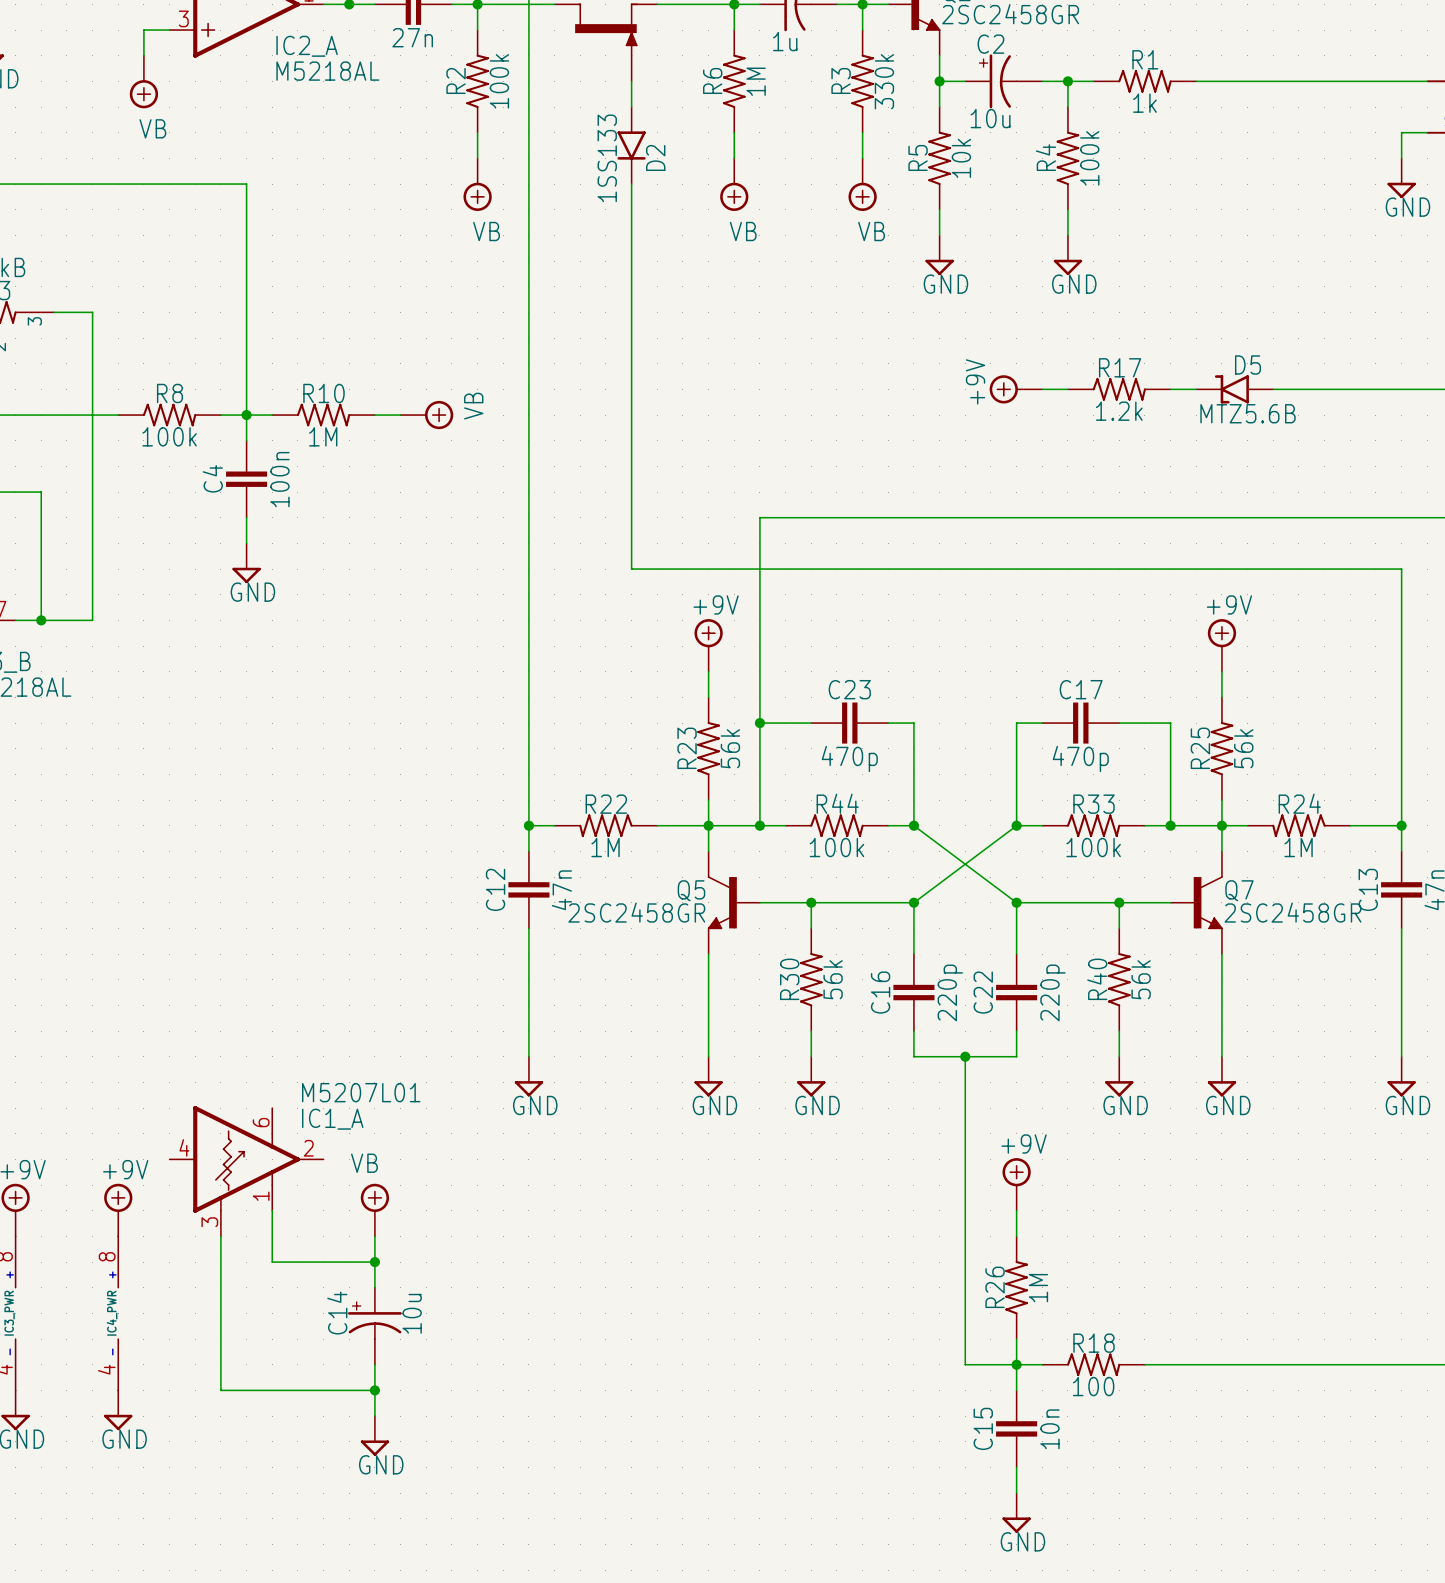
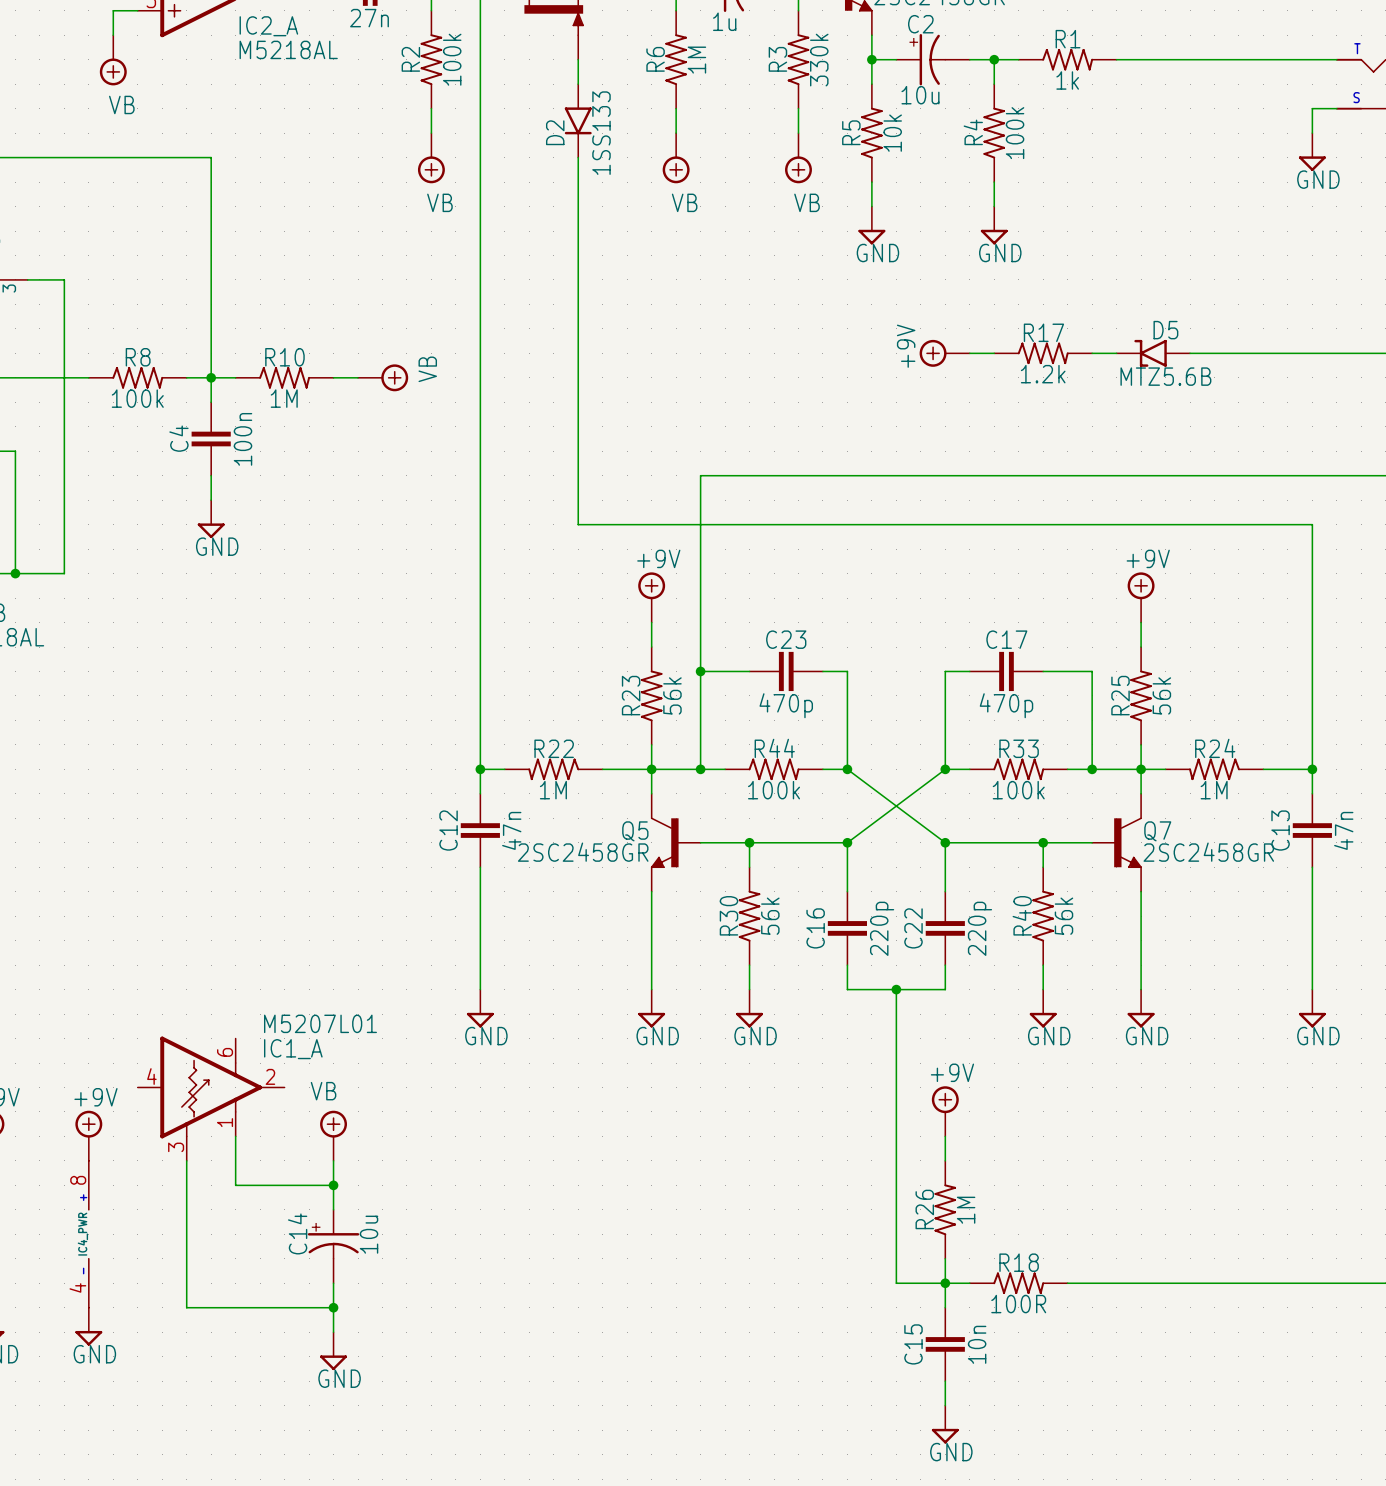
D2 name position: D2 (655, 157) -> D2 (555, 132)
D2 value position: 1SS133 (607, 158) -> 1SS133 (601, 133)
R18 value: 100 (1093, 1386) -> 100R (1018, 1304)

